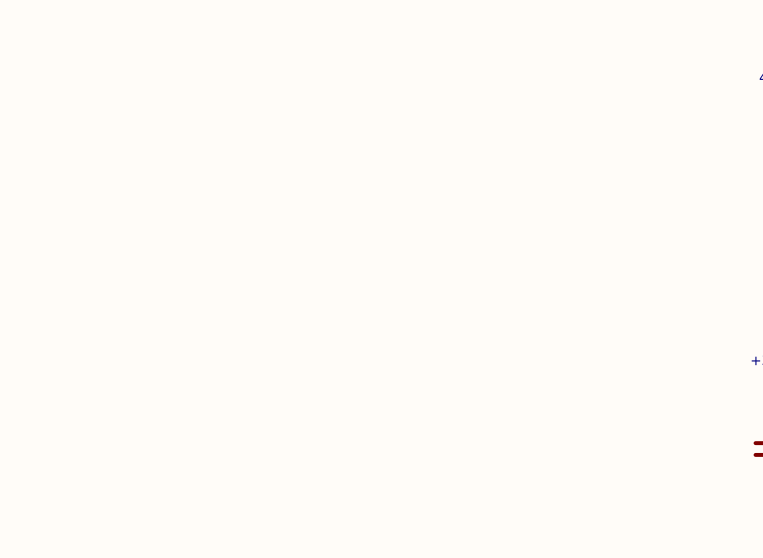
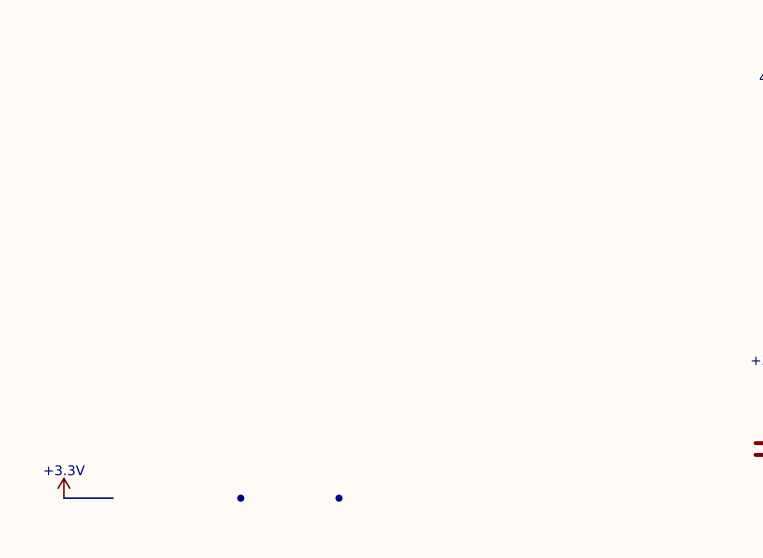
power symbol: none -> +3.3V (63, 488)
wire: none -> (63, 498) (113, 498)
junction: none -> (240, 498)
junction: none -> (339, 498)

